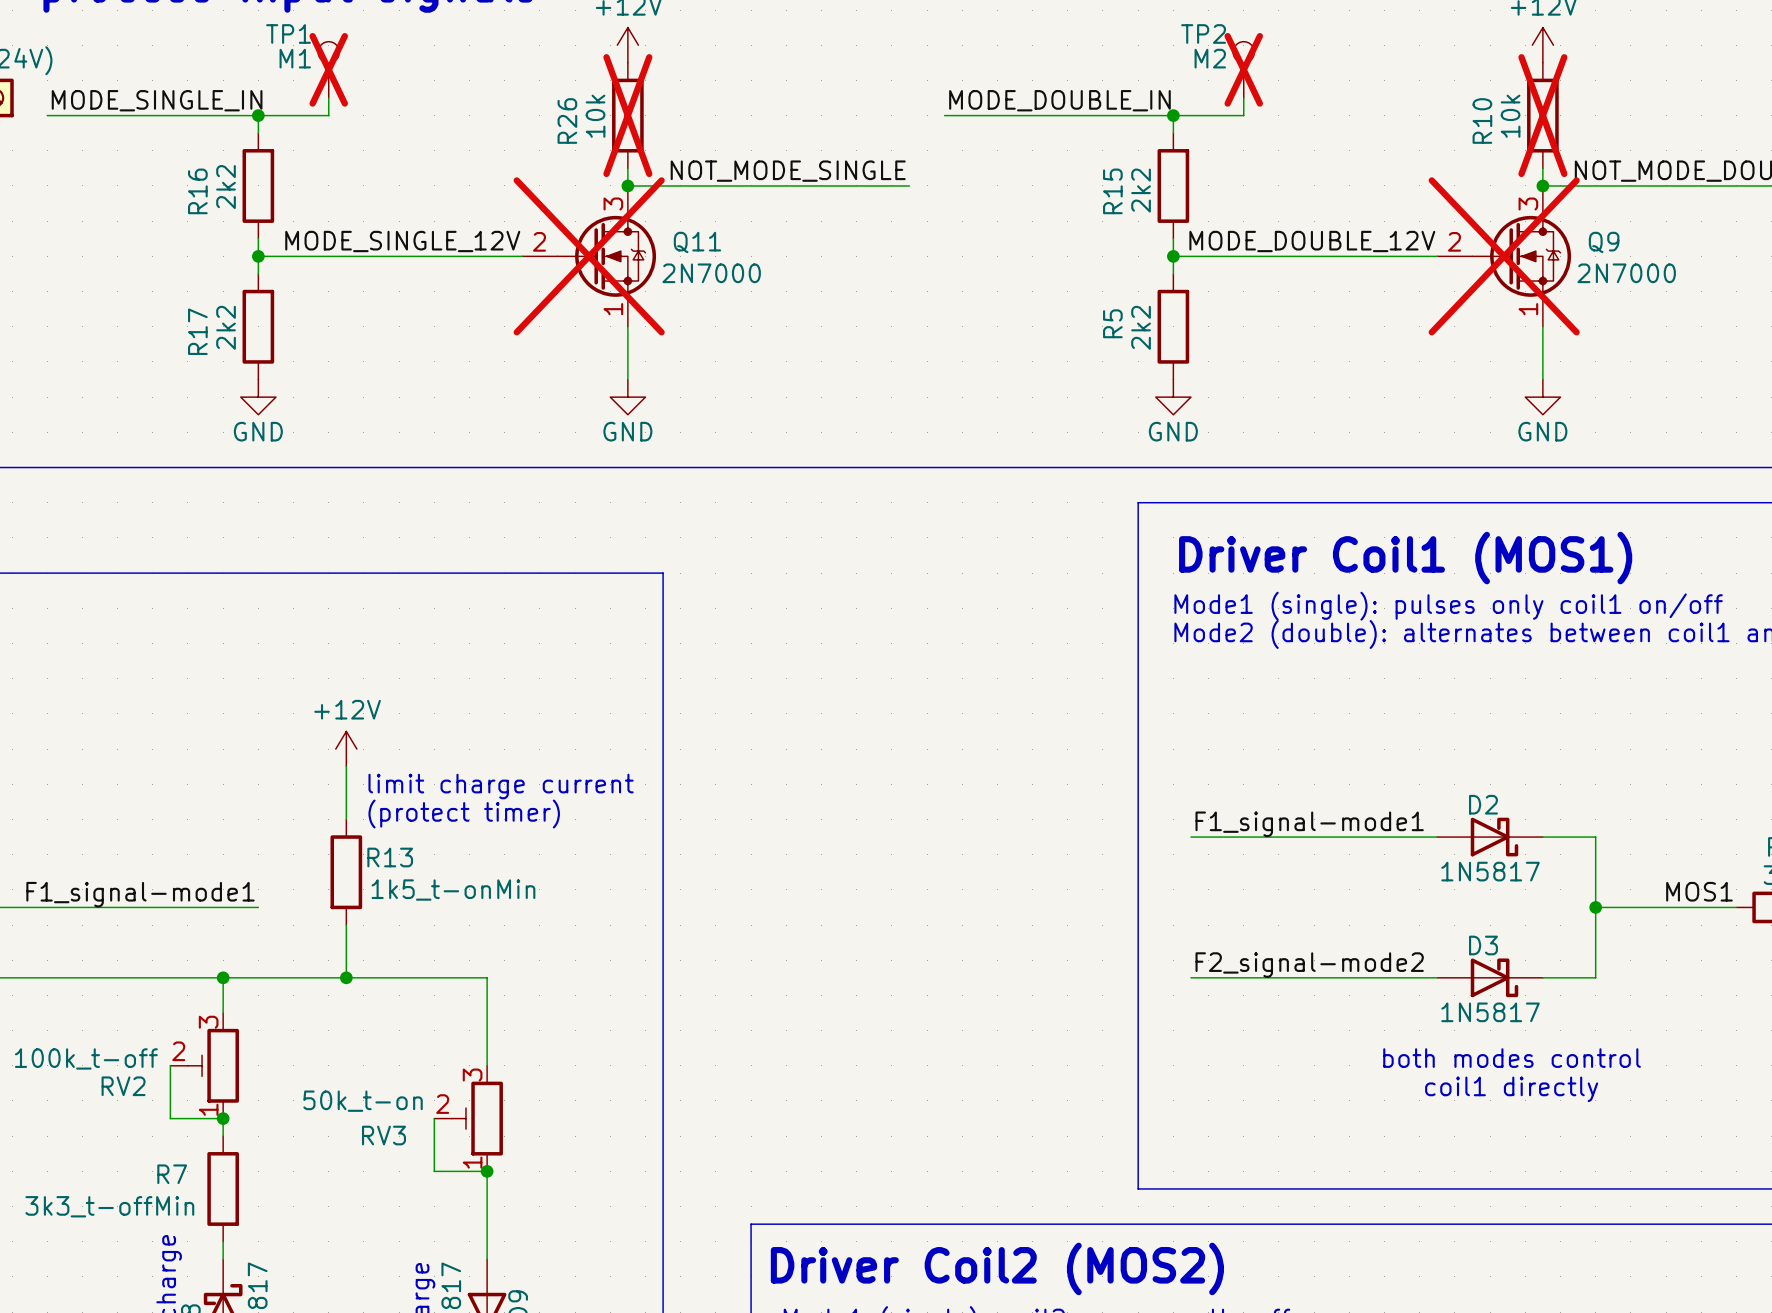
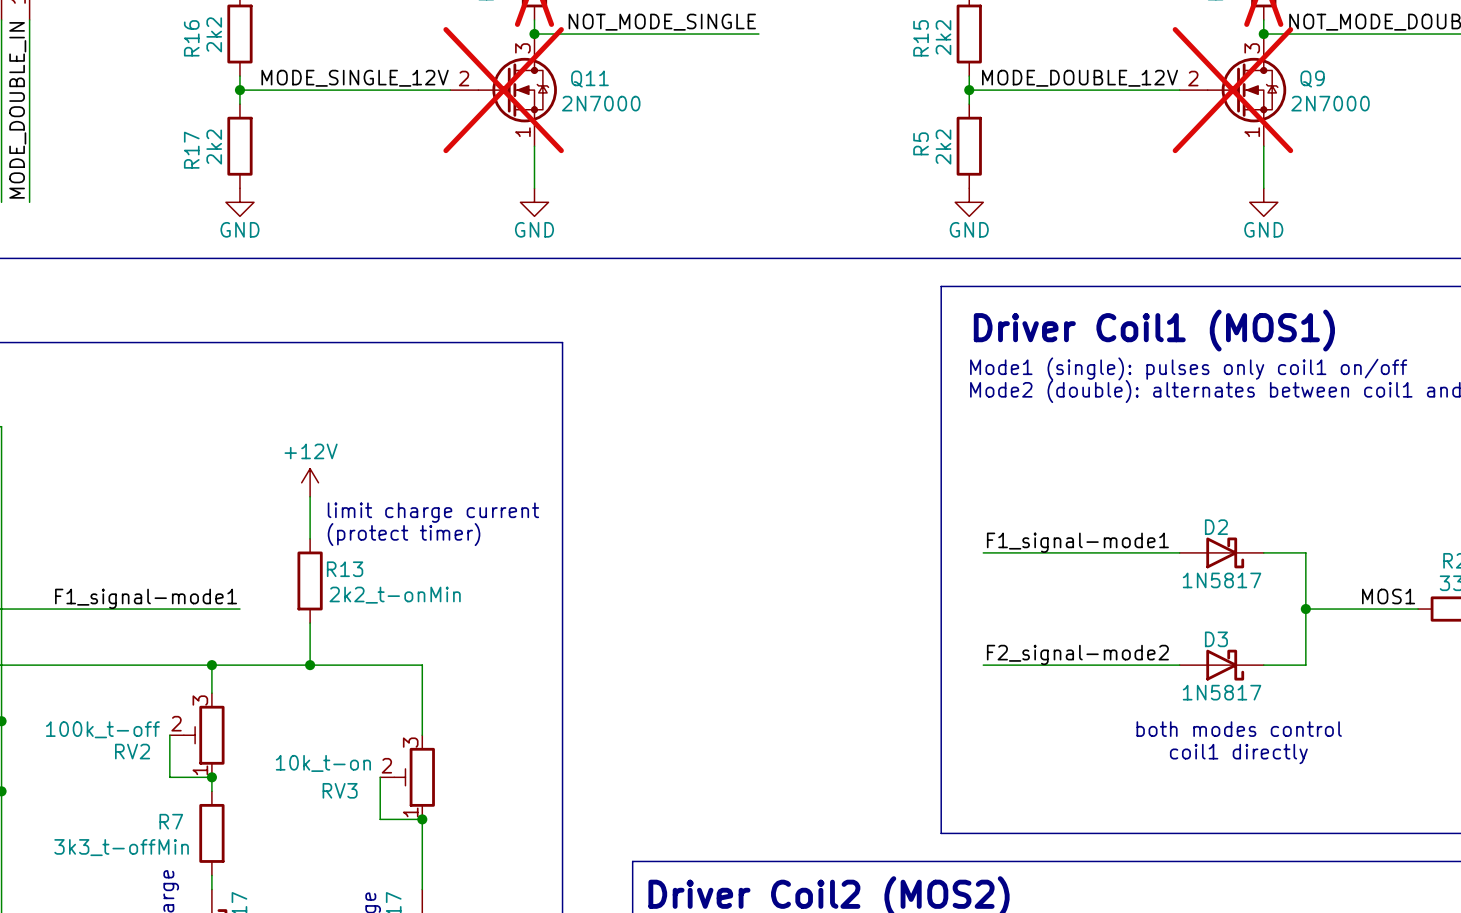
R13 value: 1k5_t-onMin (453, 890) -> 2k2_t-onMin (395, 595)
RV3 value: 50k_t-on (363, 1101) -> 10k_t-on (323, 763)

